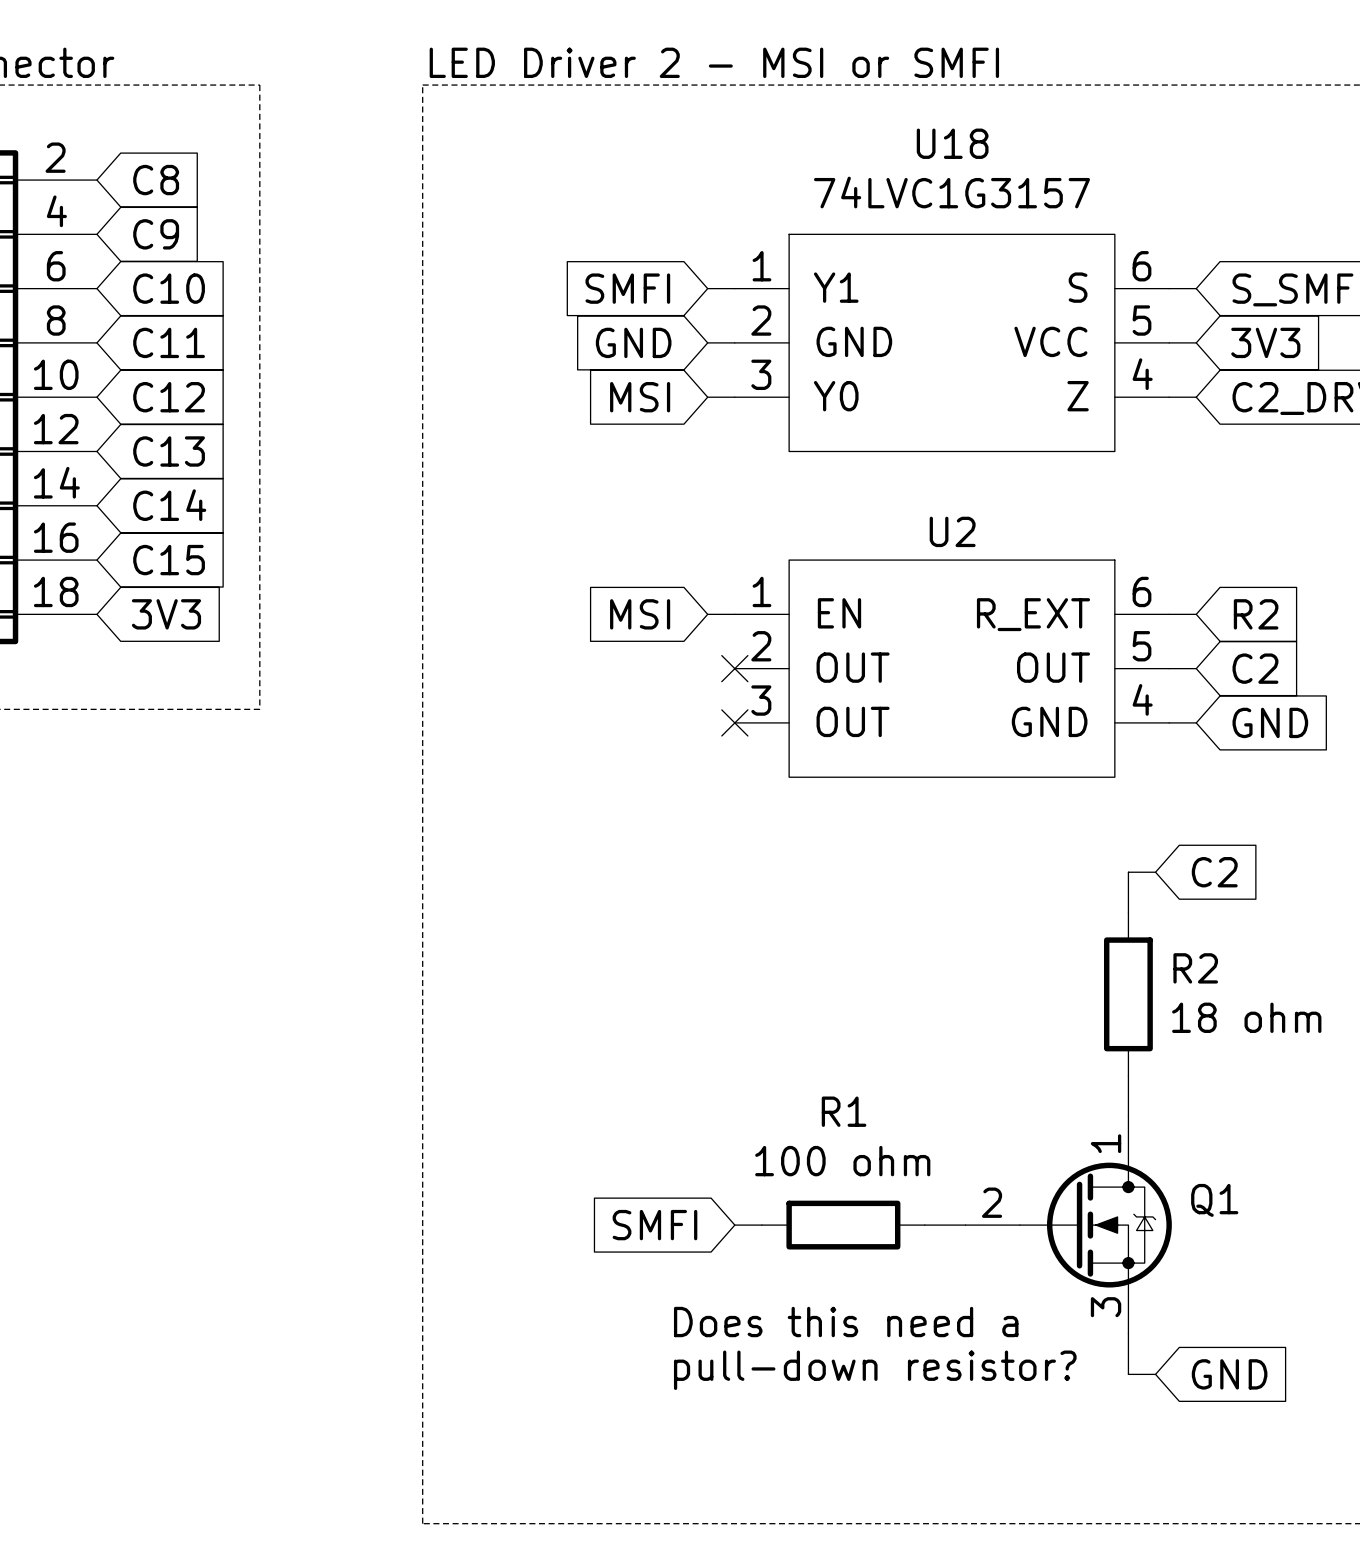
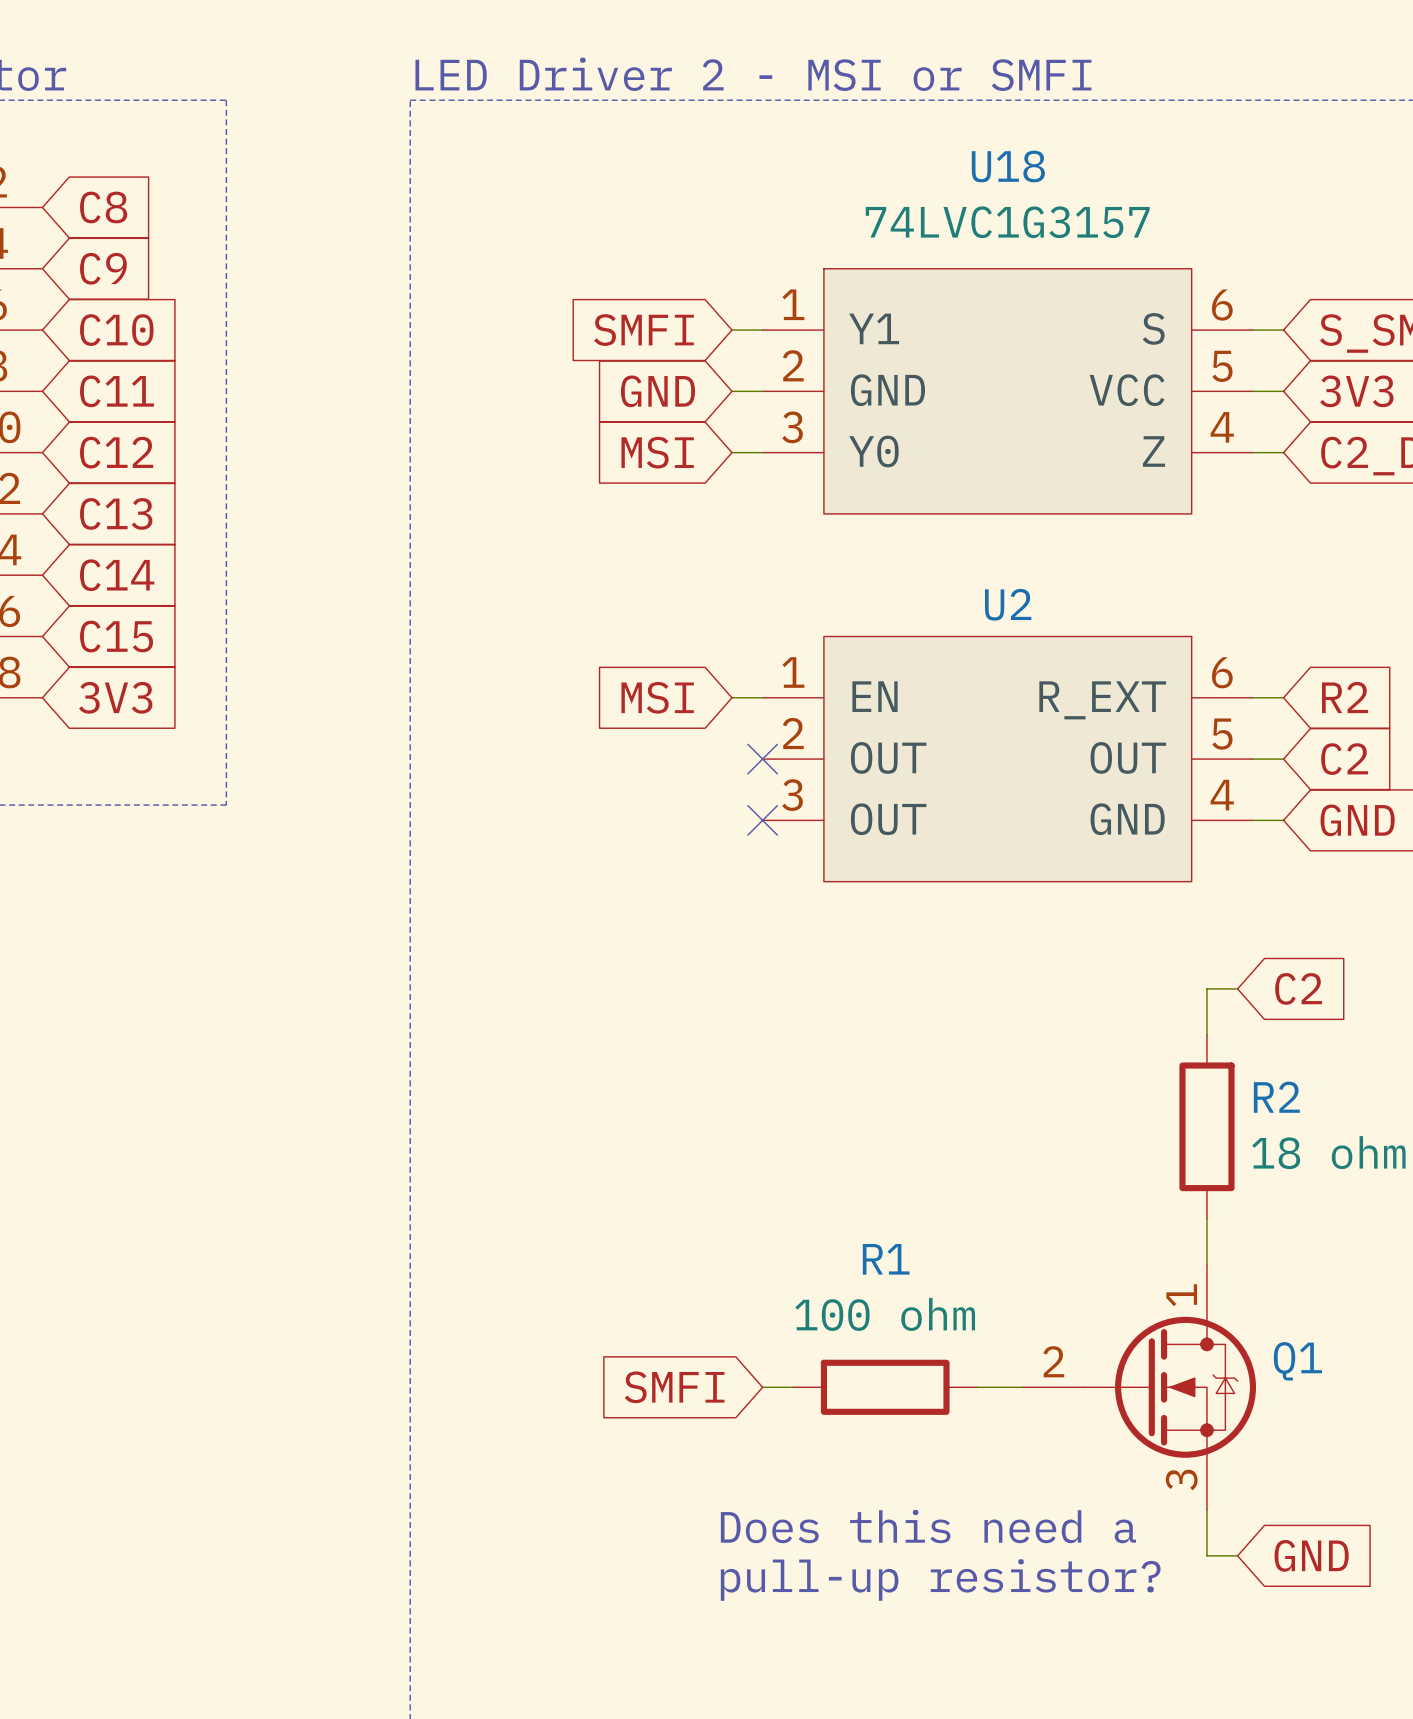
text position: Does this need a (846, 1322) -> Does this need a (928, 1526)
text: pull-down resistor? (875, 1370) -> pull-up resistor? (940, 1580)

